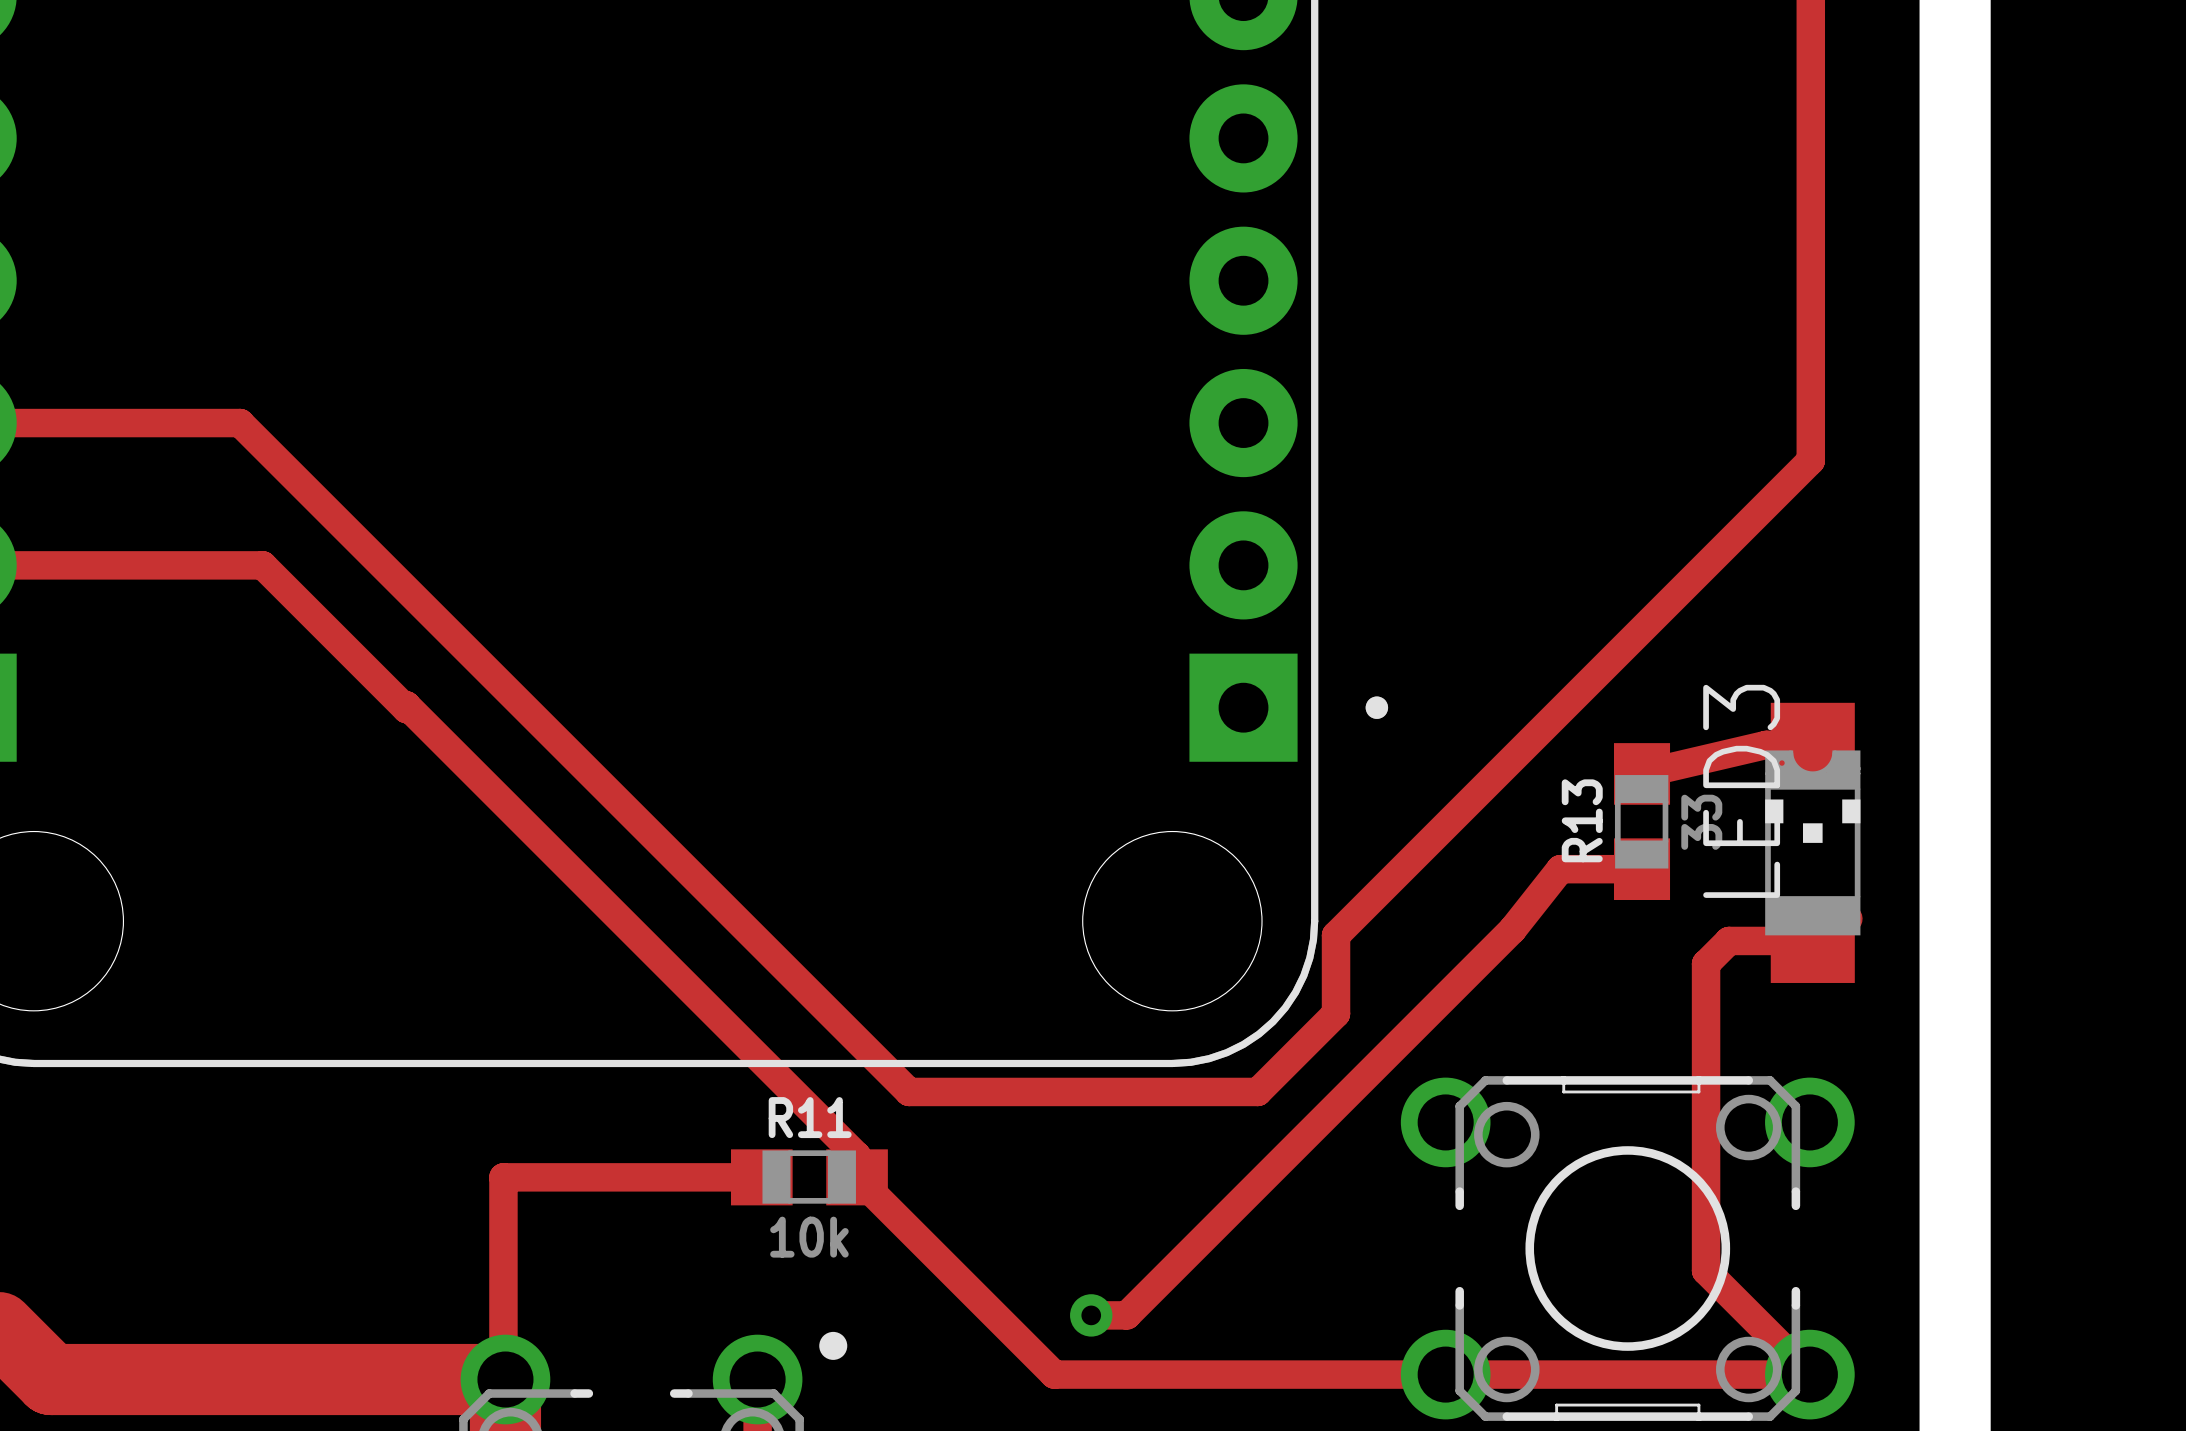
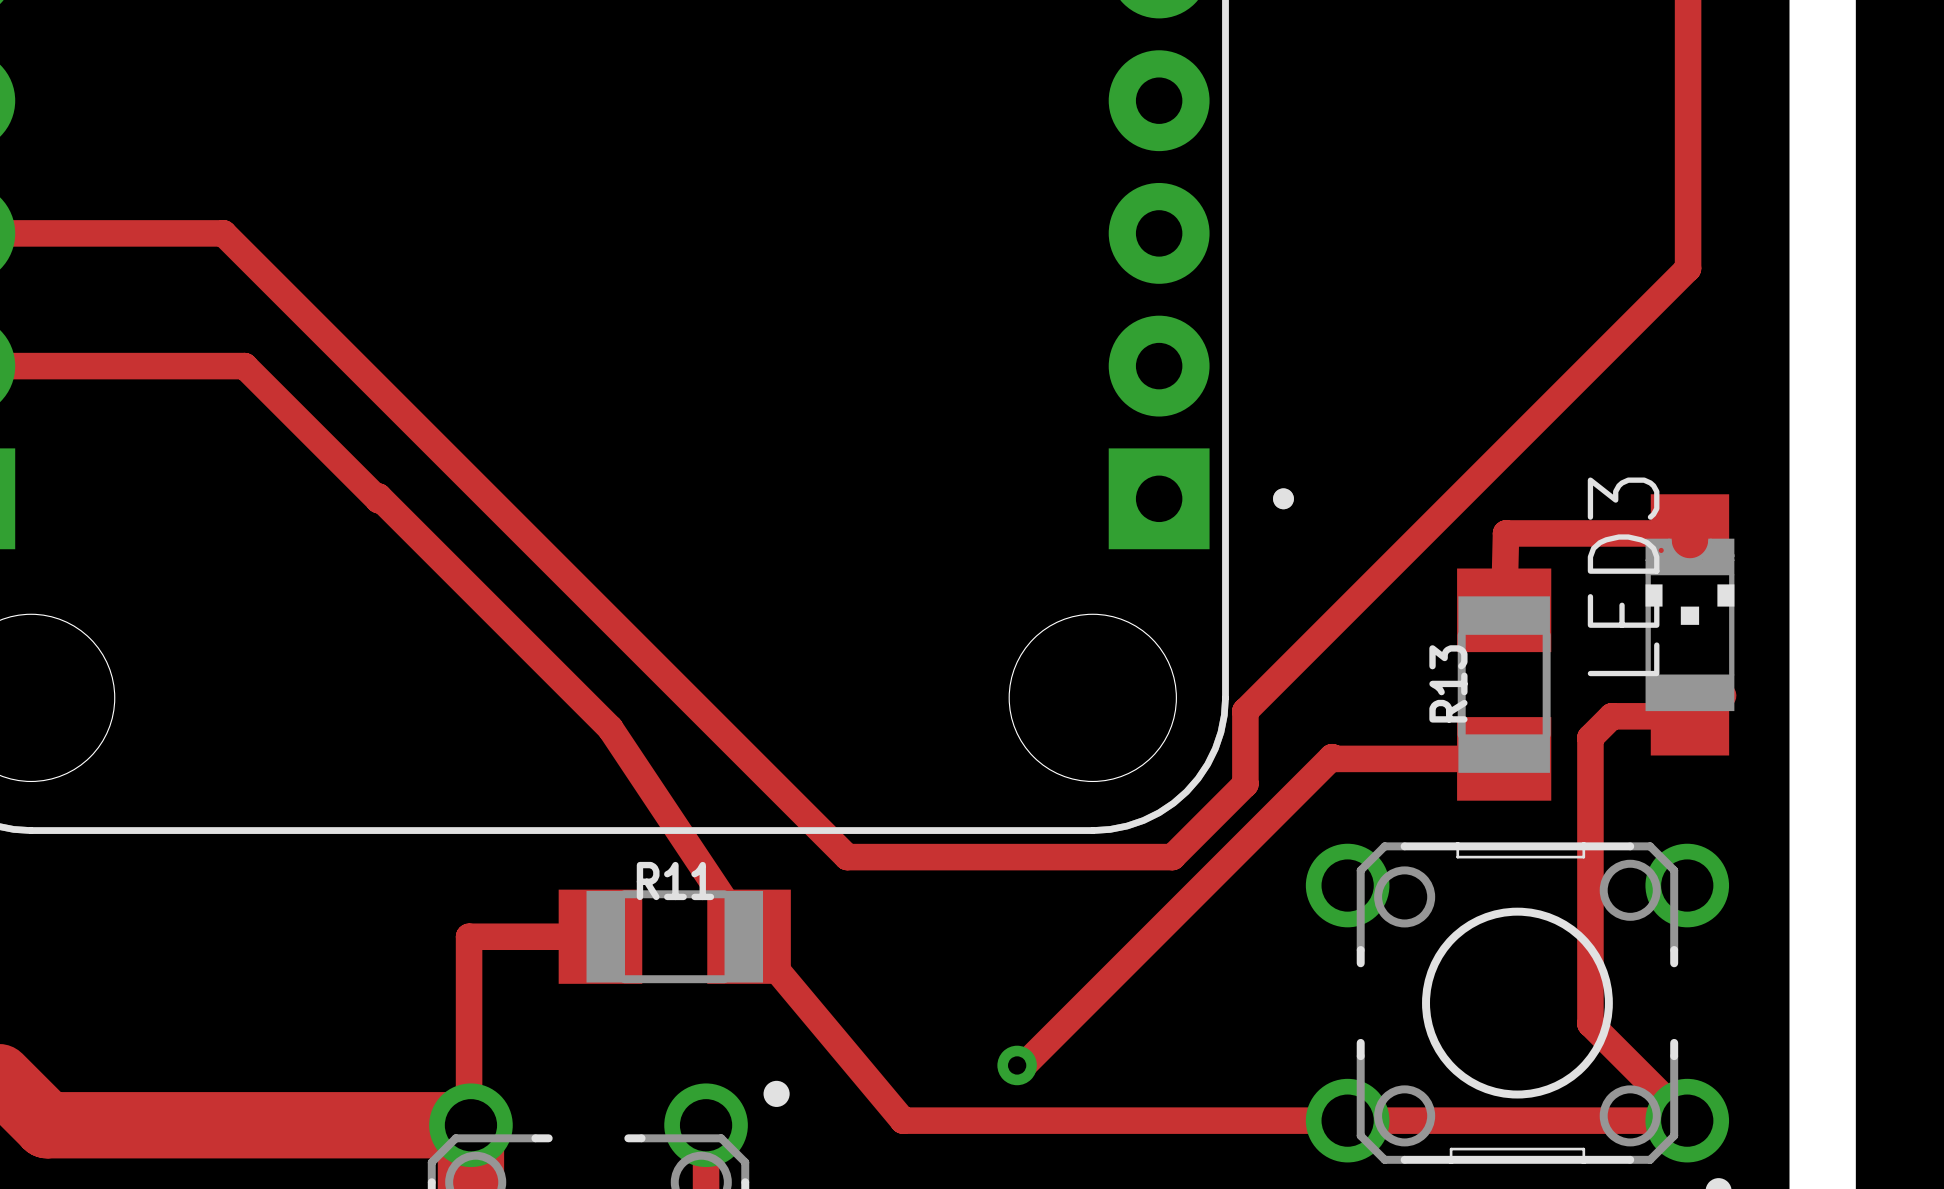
R13 footprint: [1614, 743, 1671, 900] -> [1457, 568, 1552, 801]
track: (1766, 744) (1642, 773) -> (1646, 533) (1506, 533) (1504, 610)
R13 value: 33 (1701, 822) -> none
track: (1642, 869) (1560, 869) (1512, 929) (1126, 1315) (1098, 1315) -> (1504, 758) (1336, 758) (1332, 757) (1023, 1065)
track: (654, 953) (857, 1156) (857, 1177) (1054, 1374) -> (610, 728) (749, 936) (903, 1120) (982, 1120)
R11 footprint: [730, 1149, 888, 1206] -> [558, 889, 791, 984]
track: (644, 1177) (761, 1177) -> none
R11 value: 10k (809, 1237) -> none

